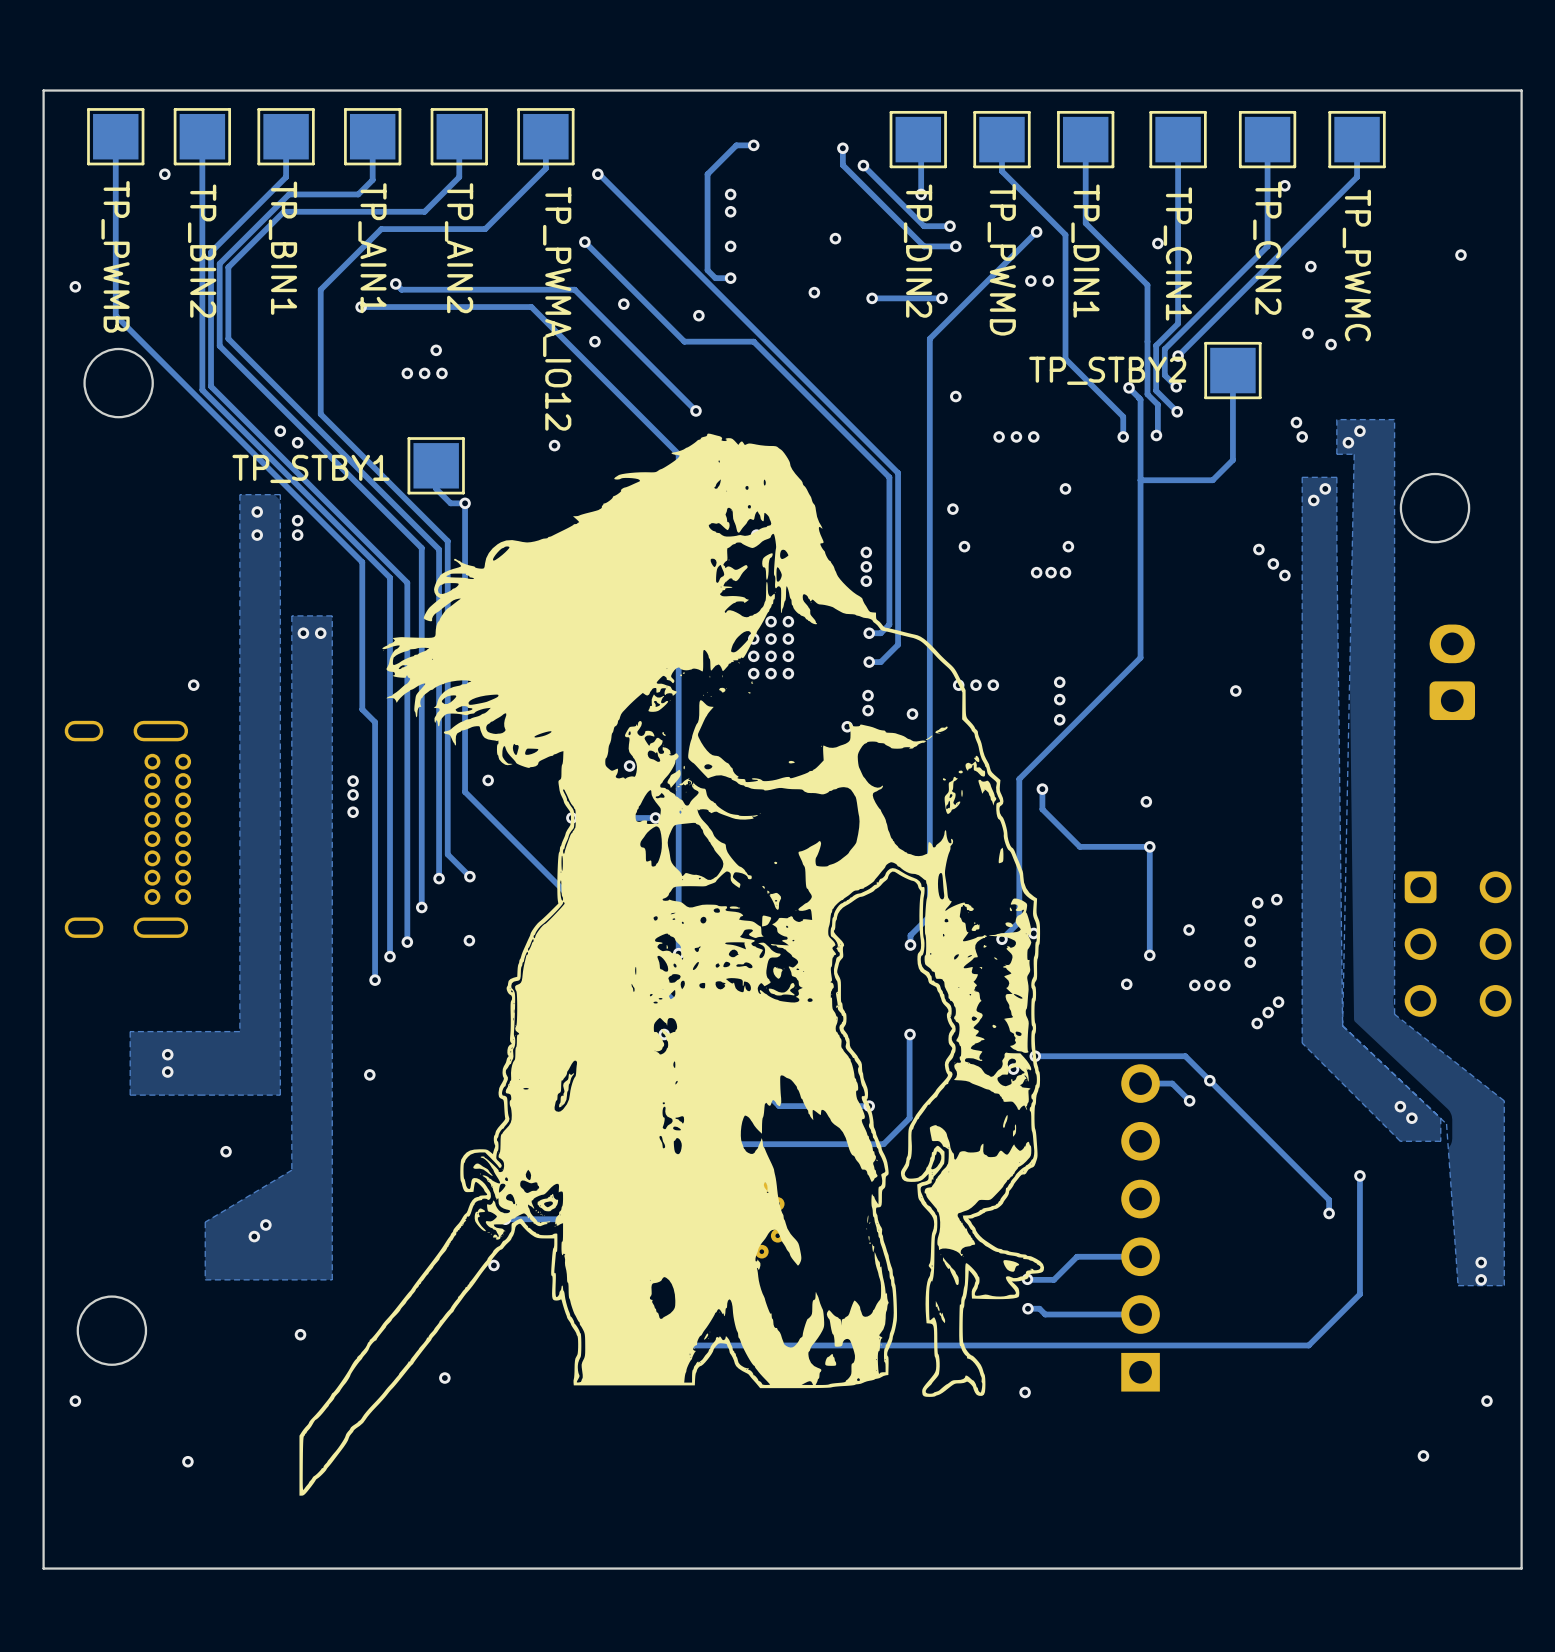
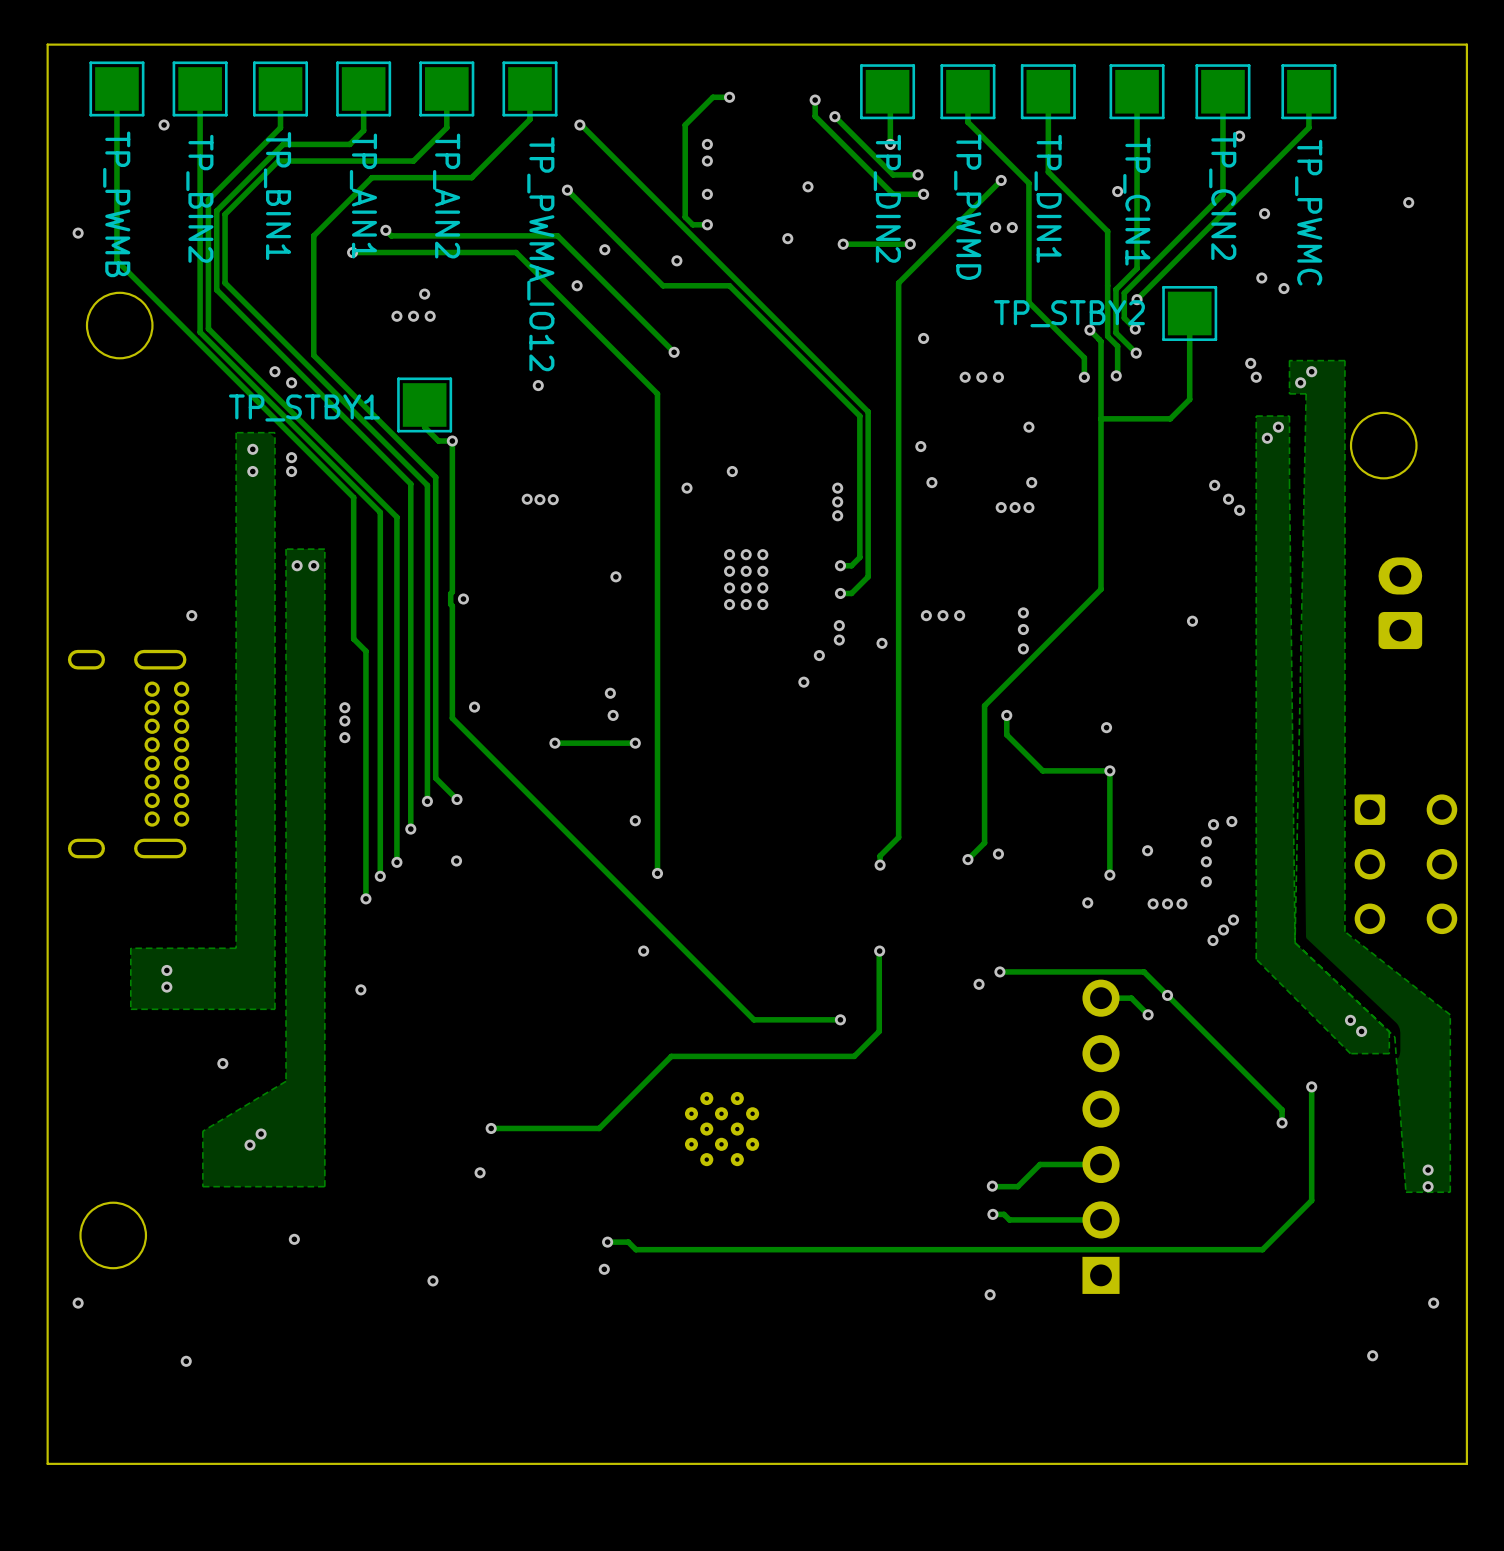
drawing: [299, 433, 1045, 1496] -> none

